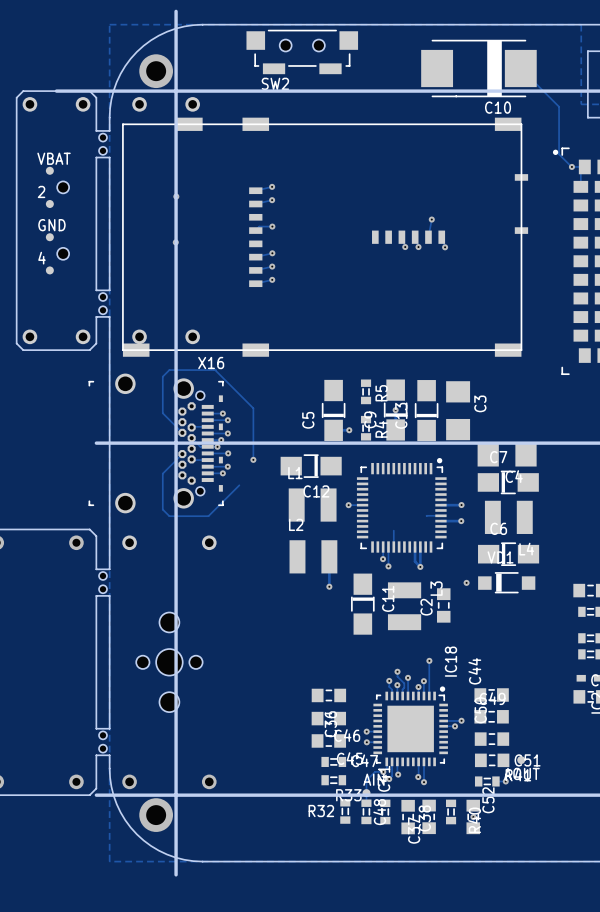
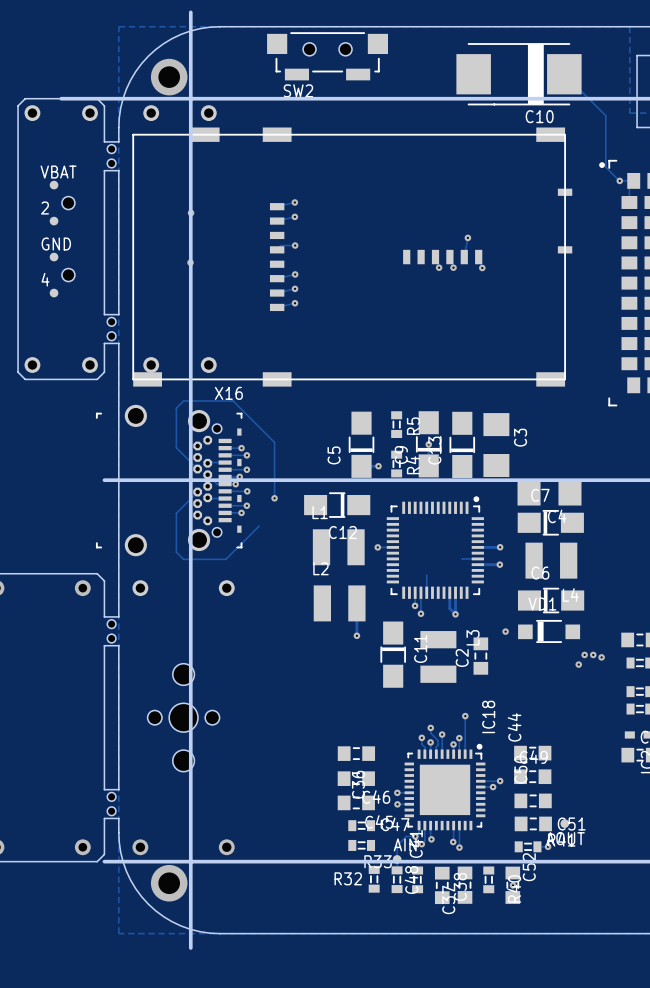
via: none -> (584, 654)
via: none -> (593, 654)
via: none -> (601, 657)
via: none -> (578, 664)

